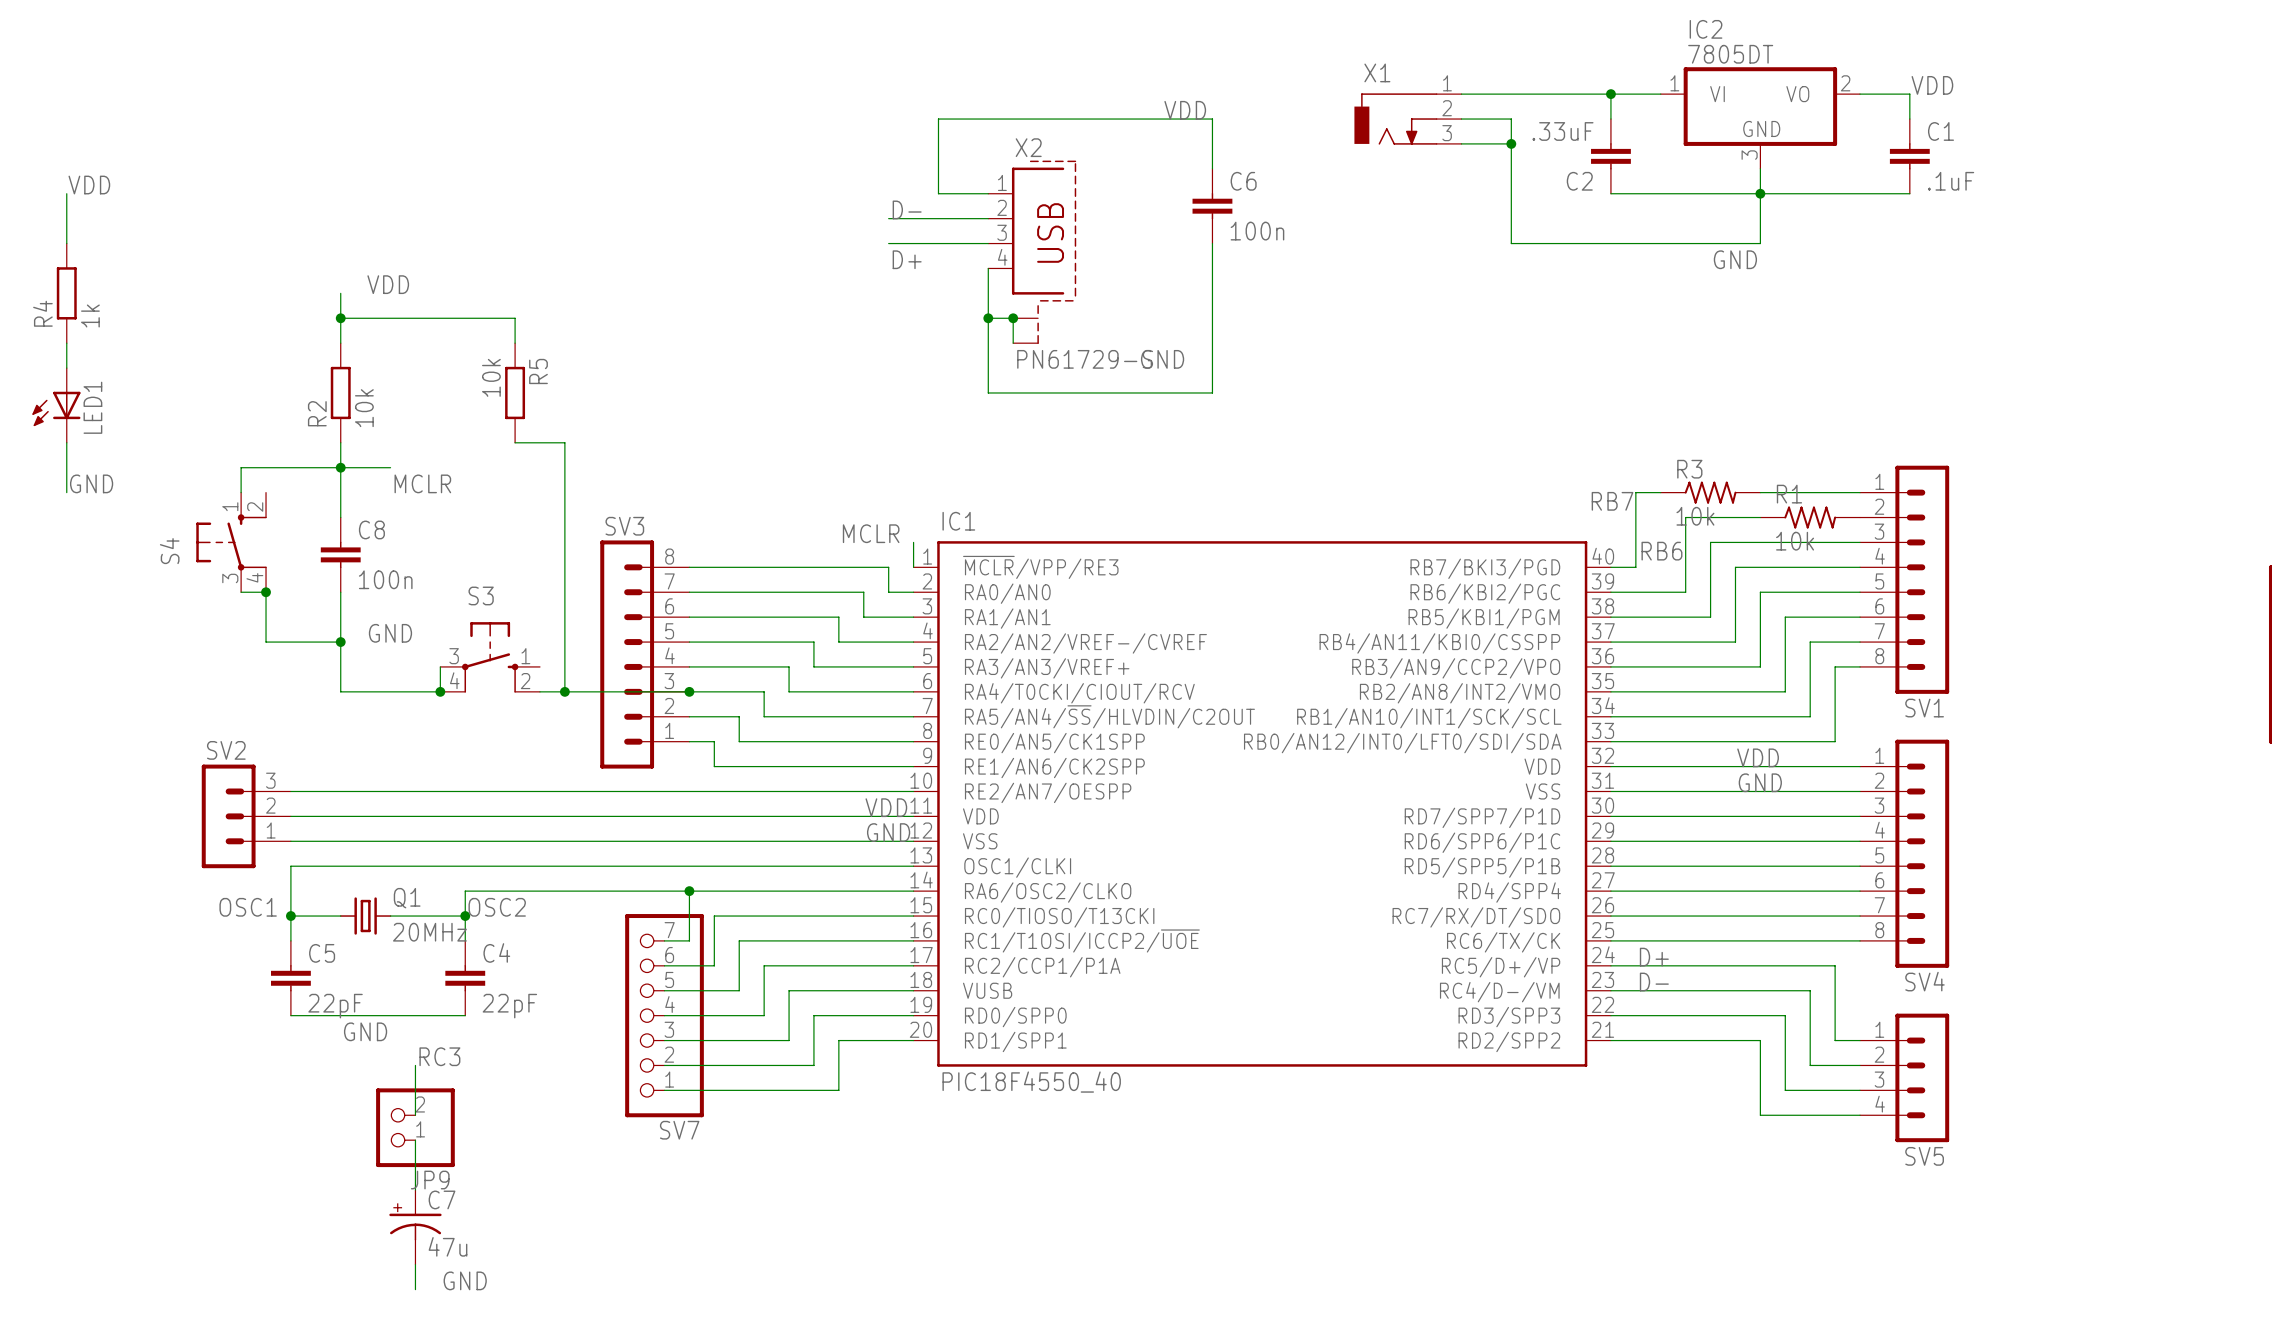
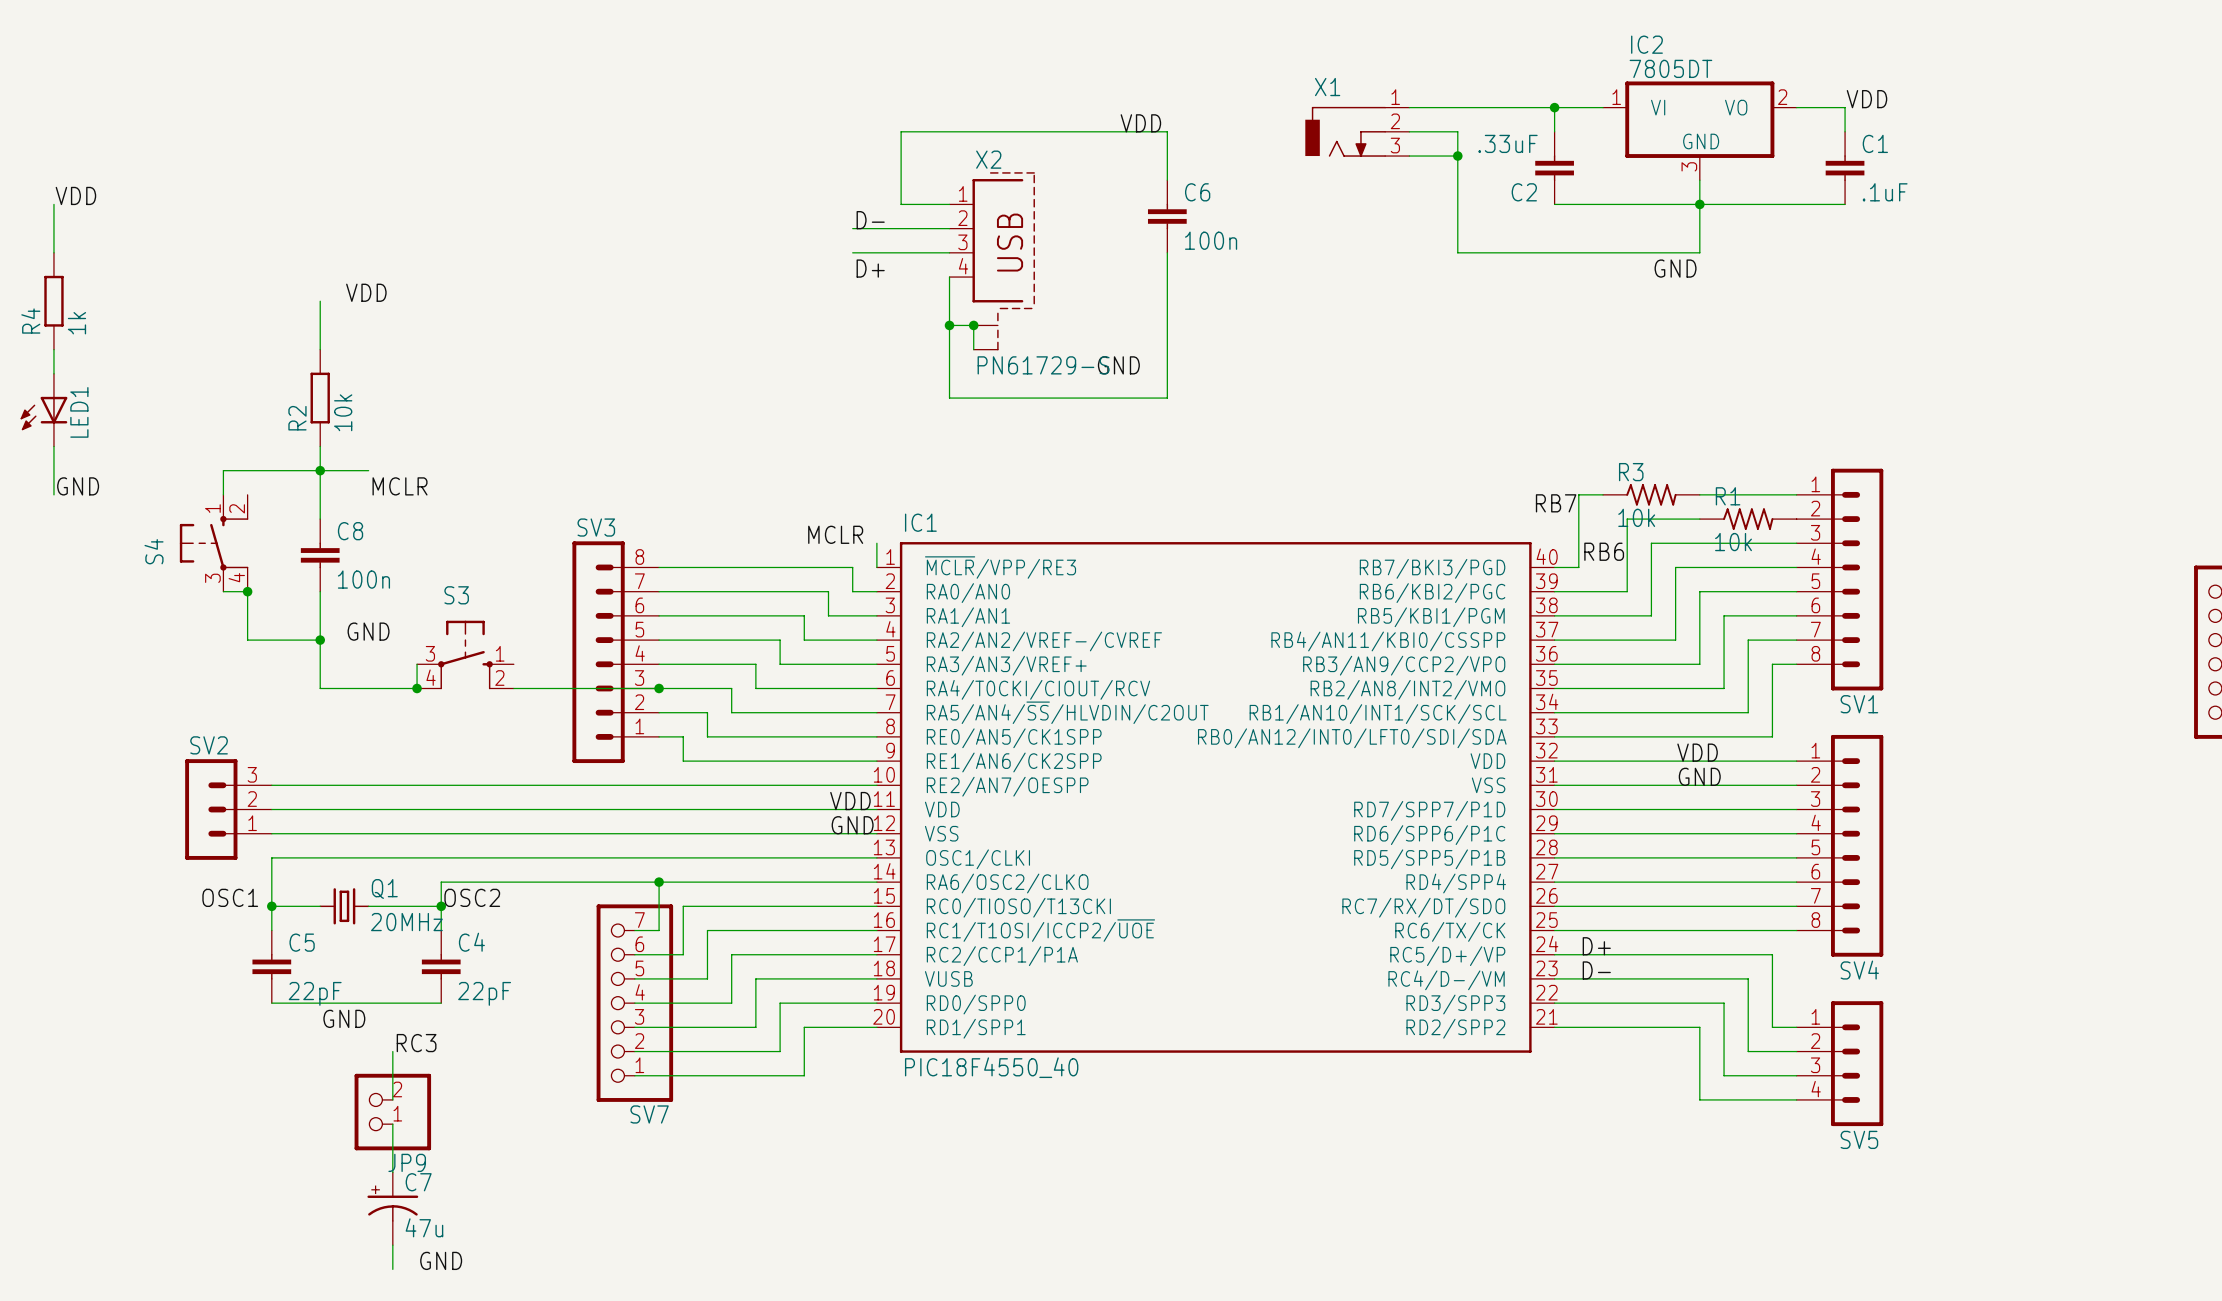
wire: (340, 318) (515, 318) (515, 343) -> none
junction: (340, 318) -> none
R5: 10k (515, 392) -> none
wire: (515, 442) (564, 442) (564, 691) -> none
junction: (564, 691) -> none

